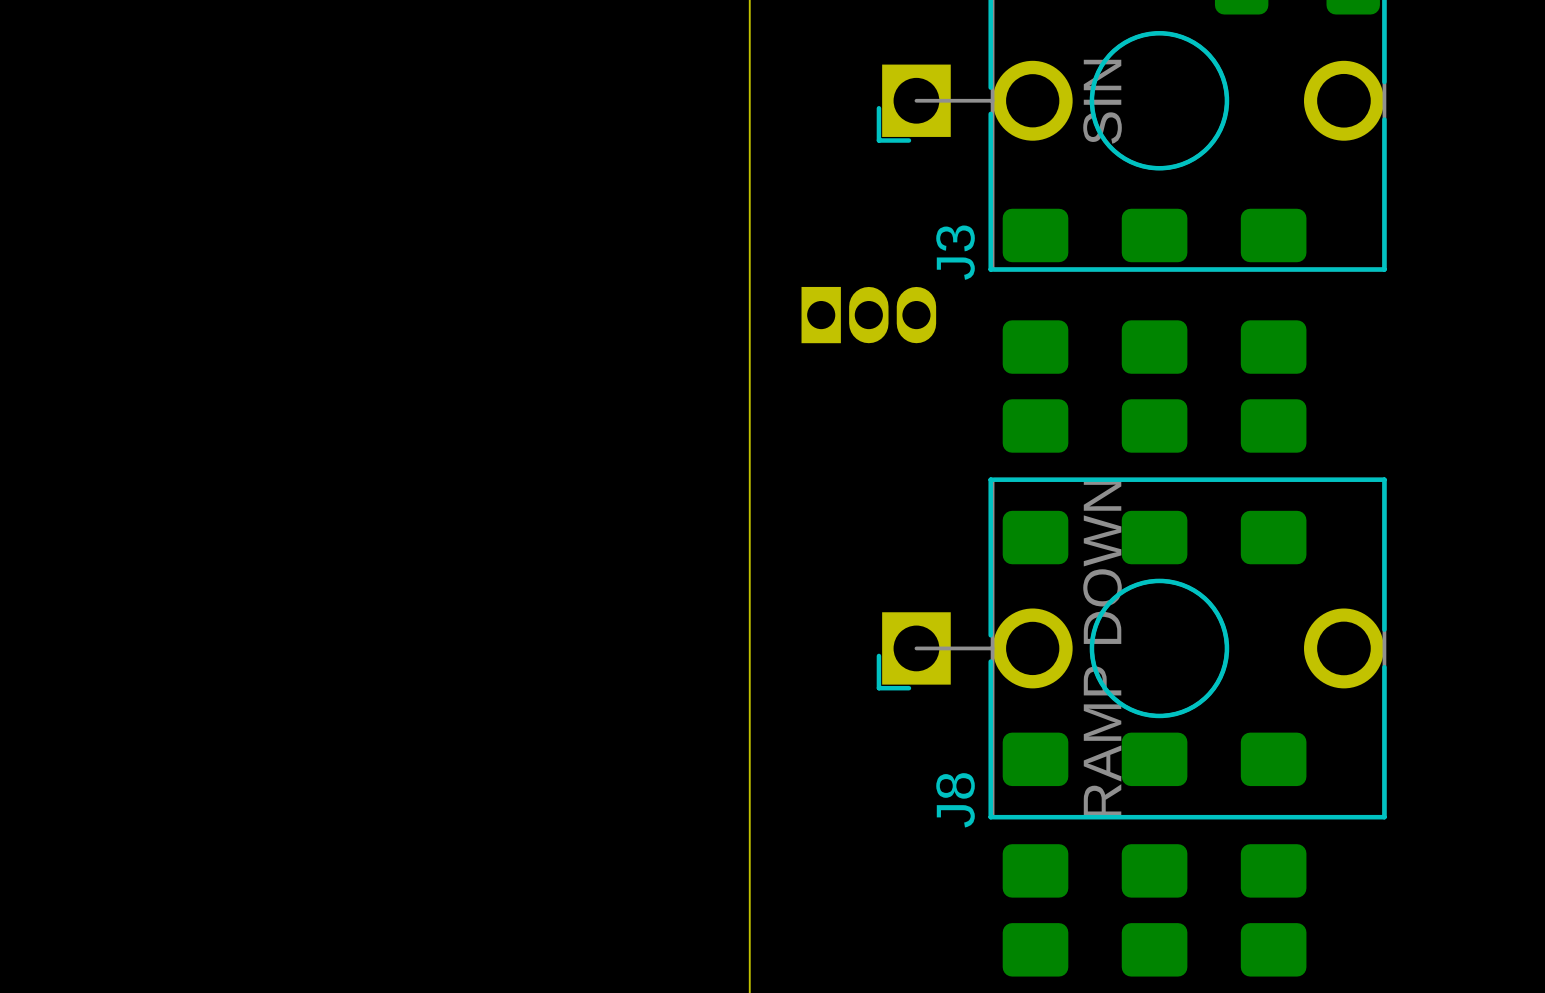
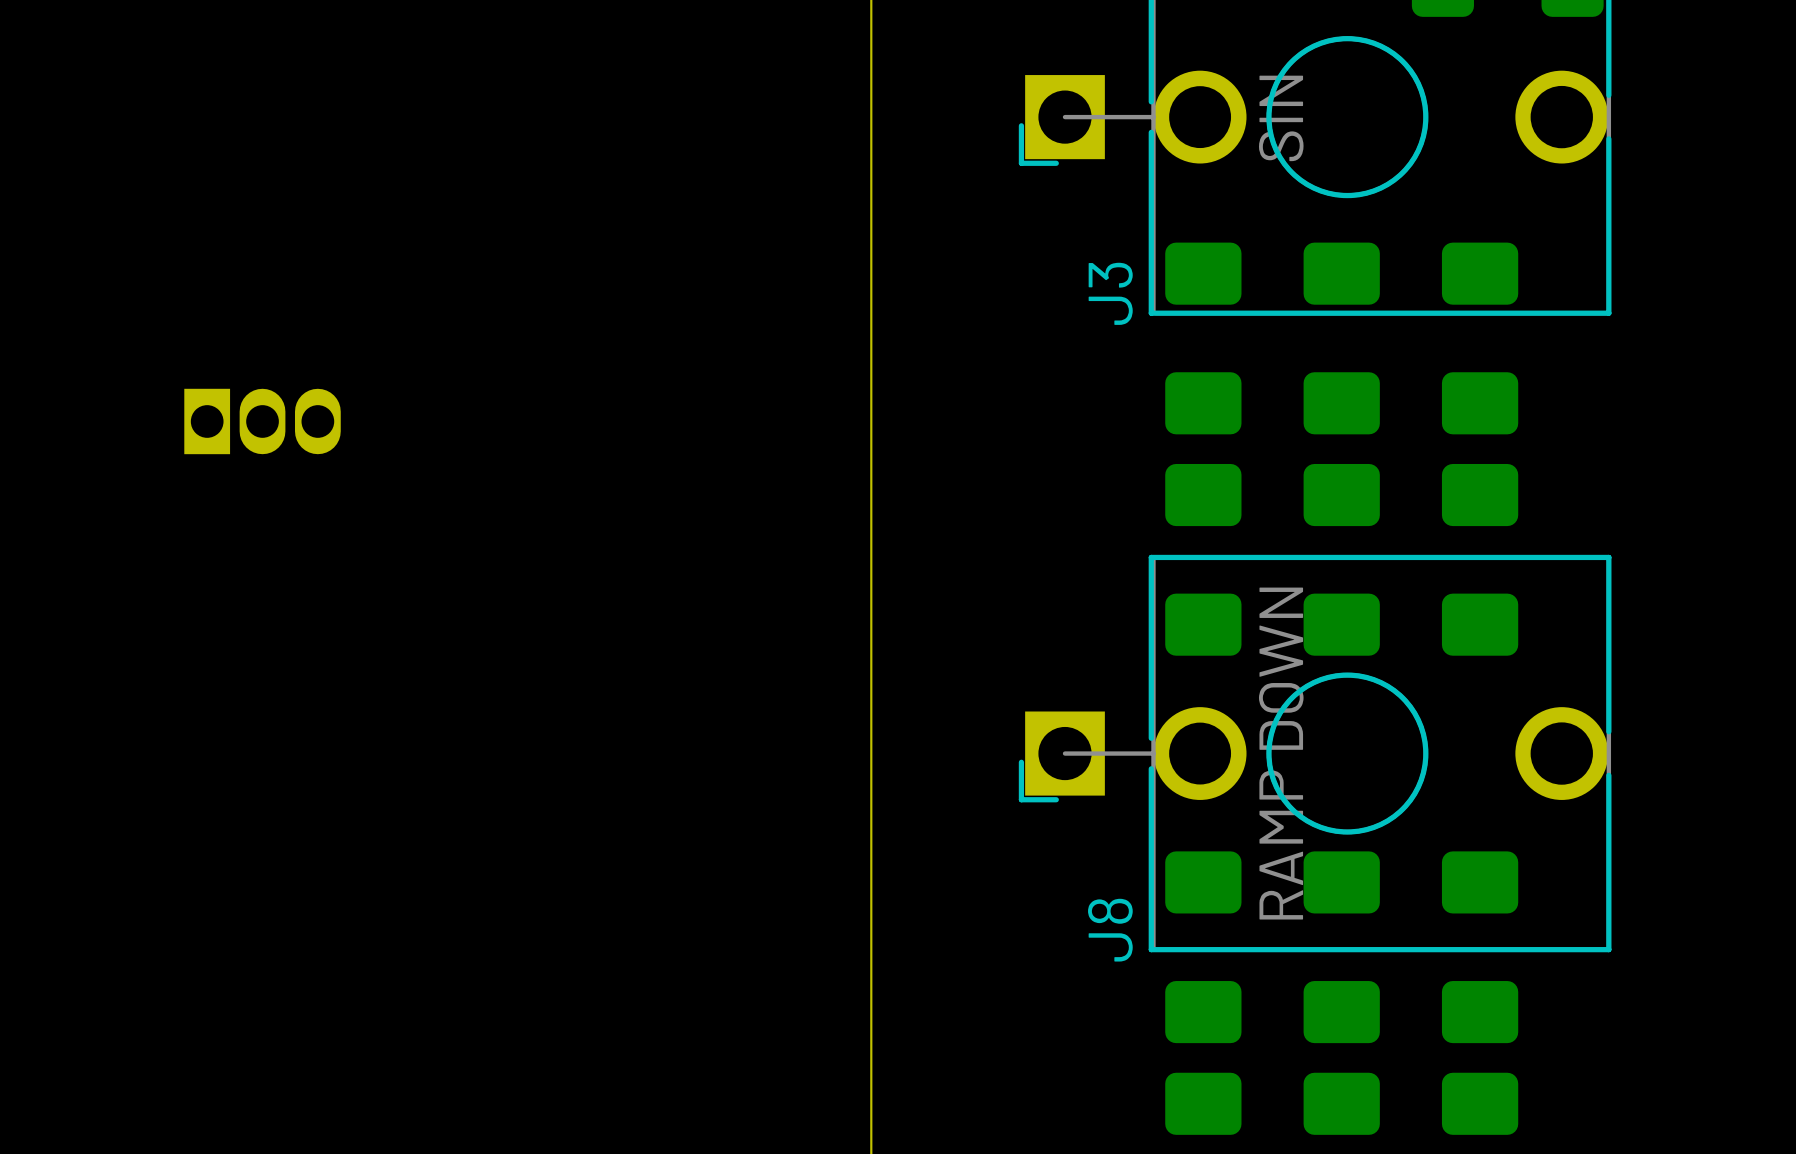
part position: (868, 315) -> (262, 421)

